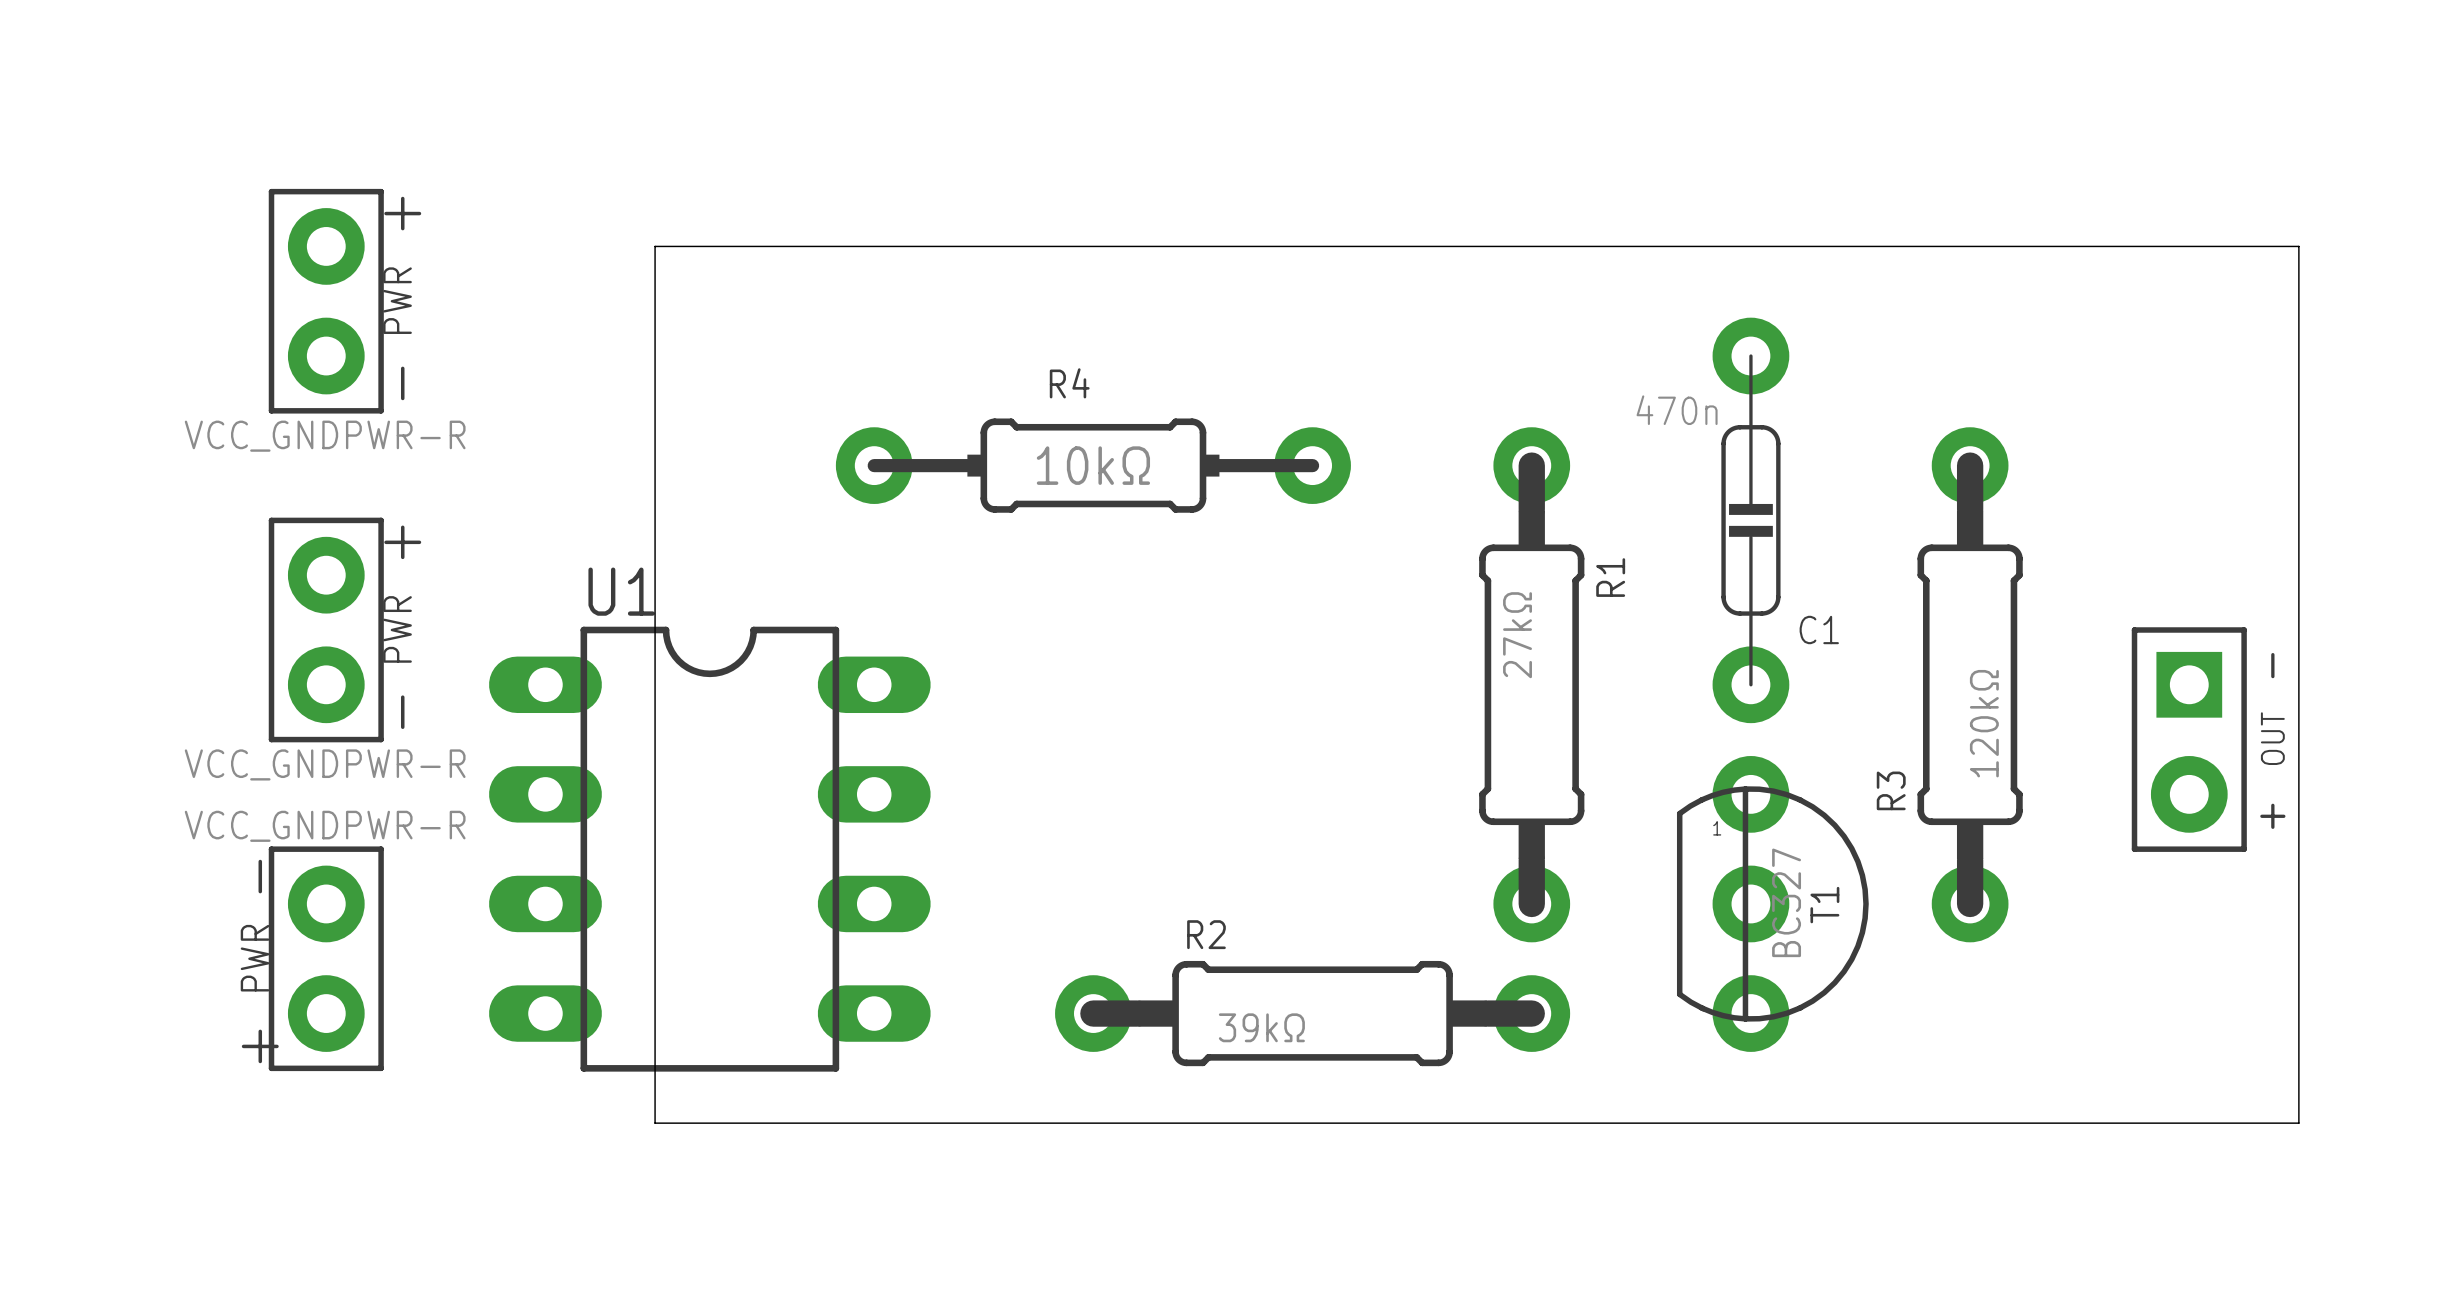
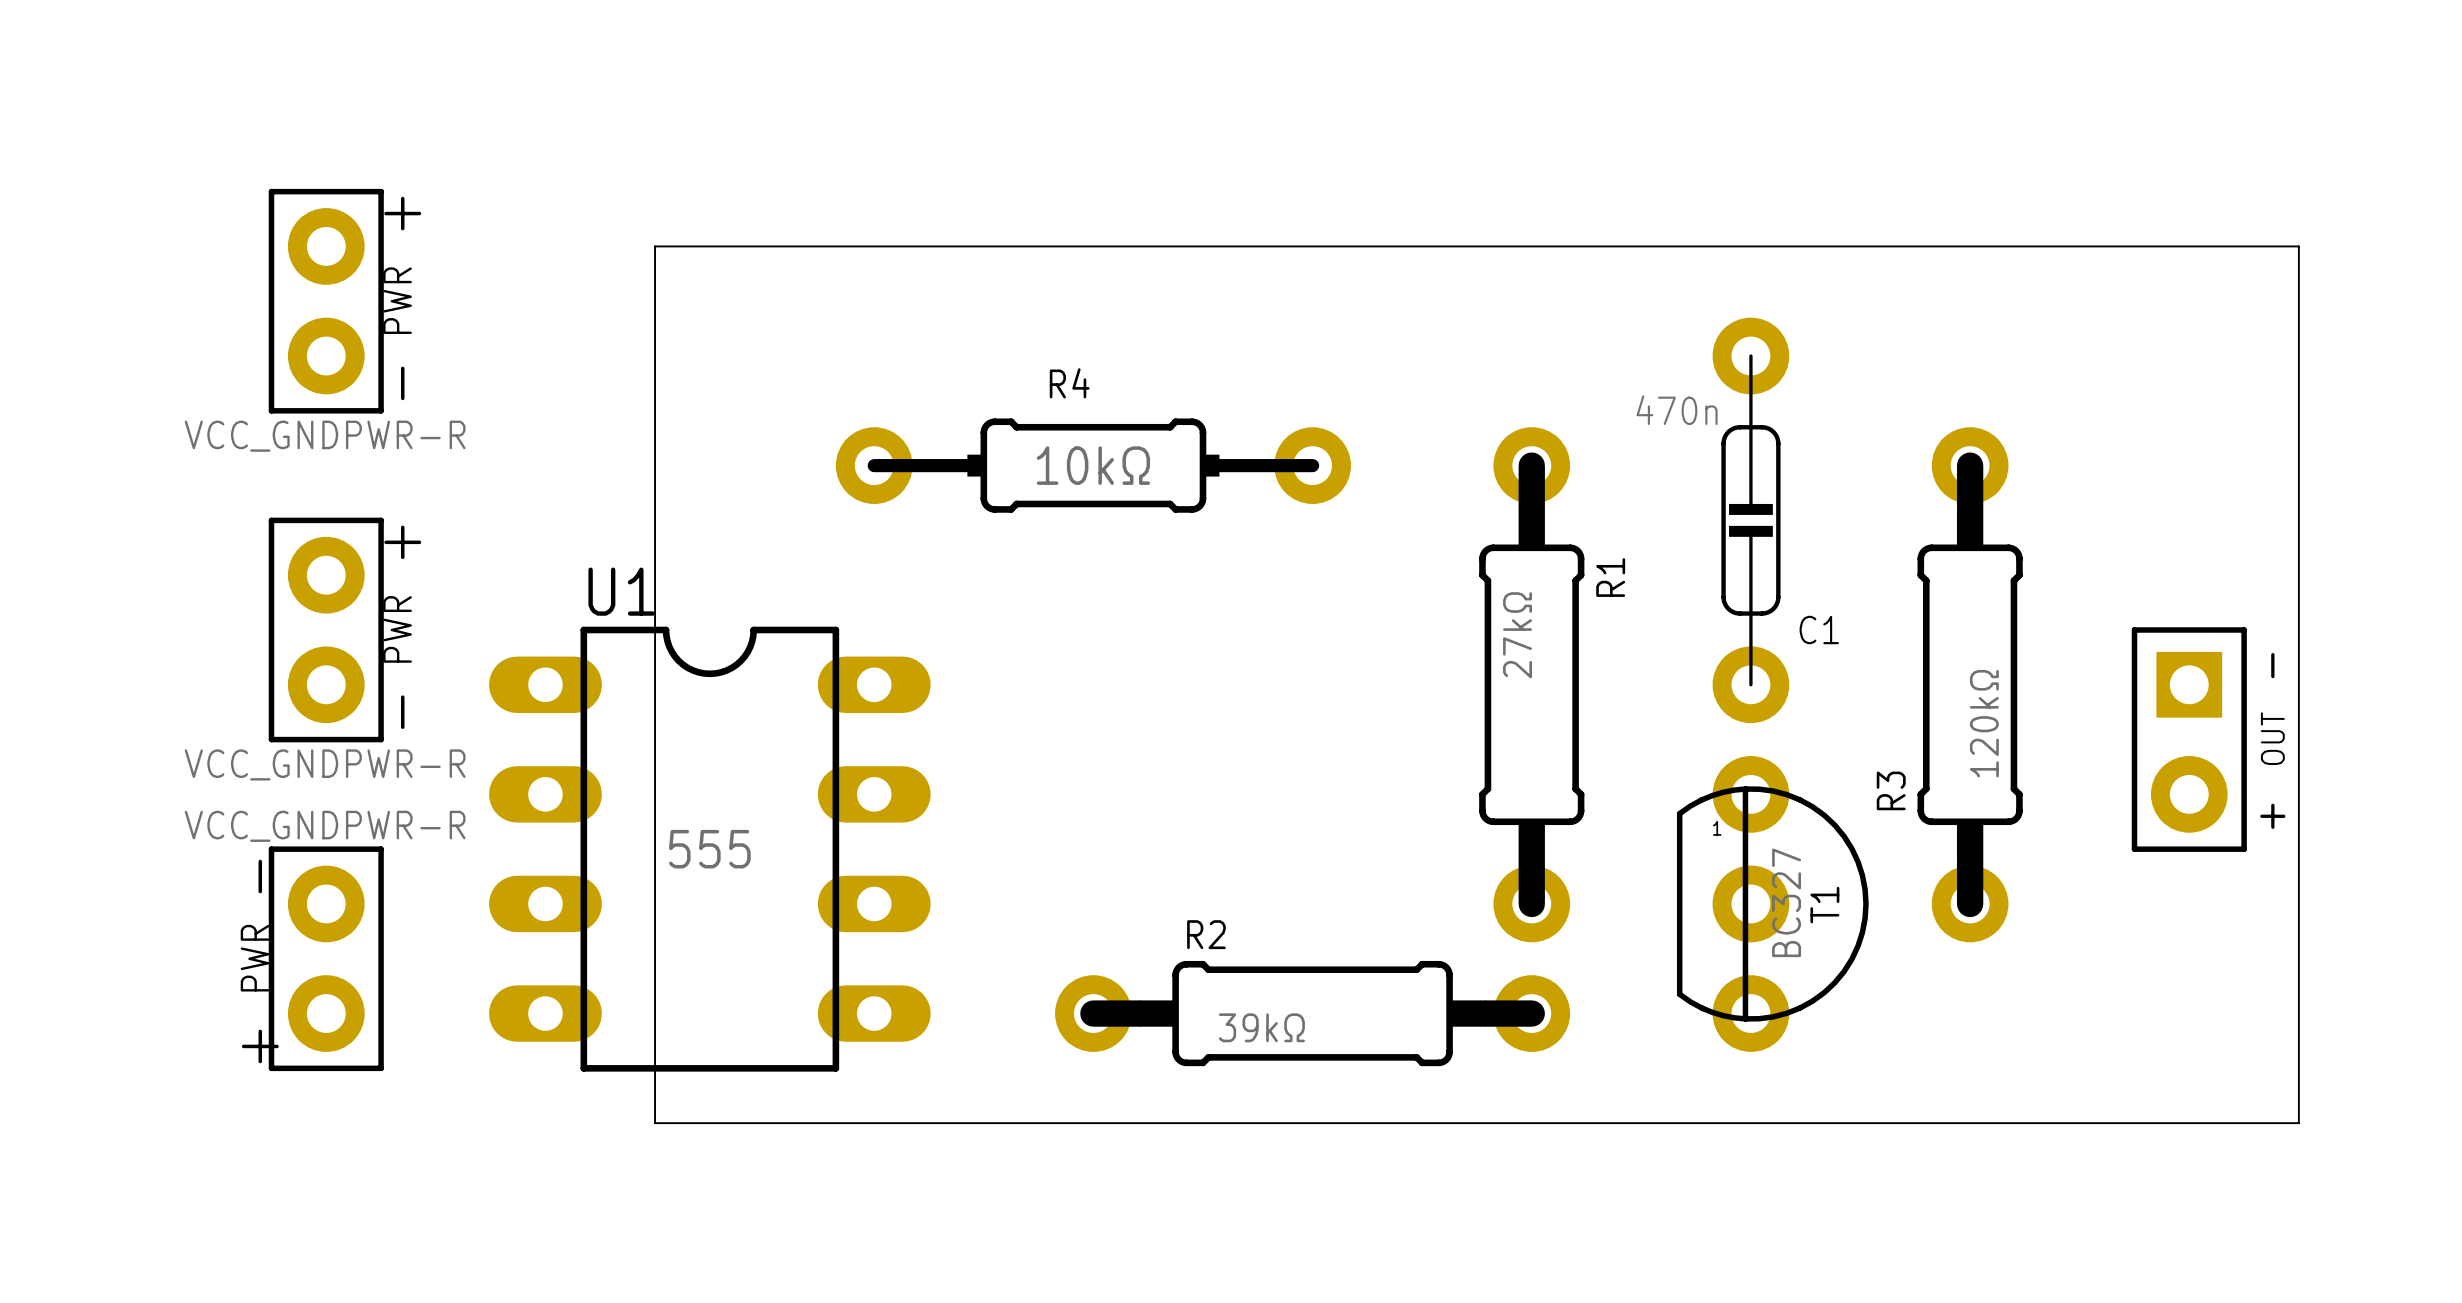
U1 value: none -> 555 (709, 849)

